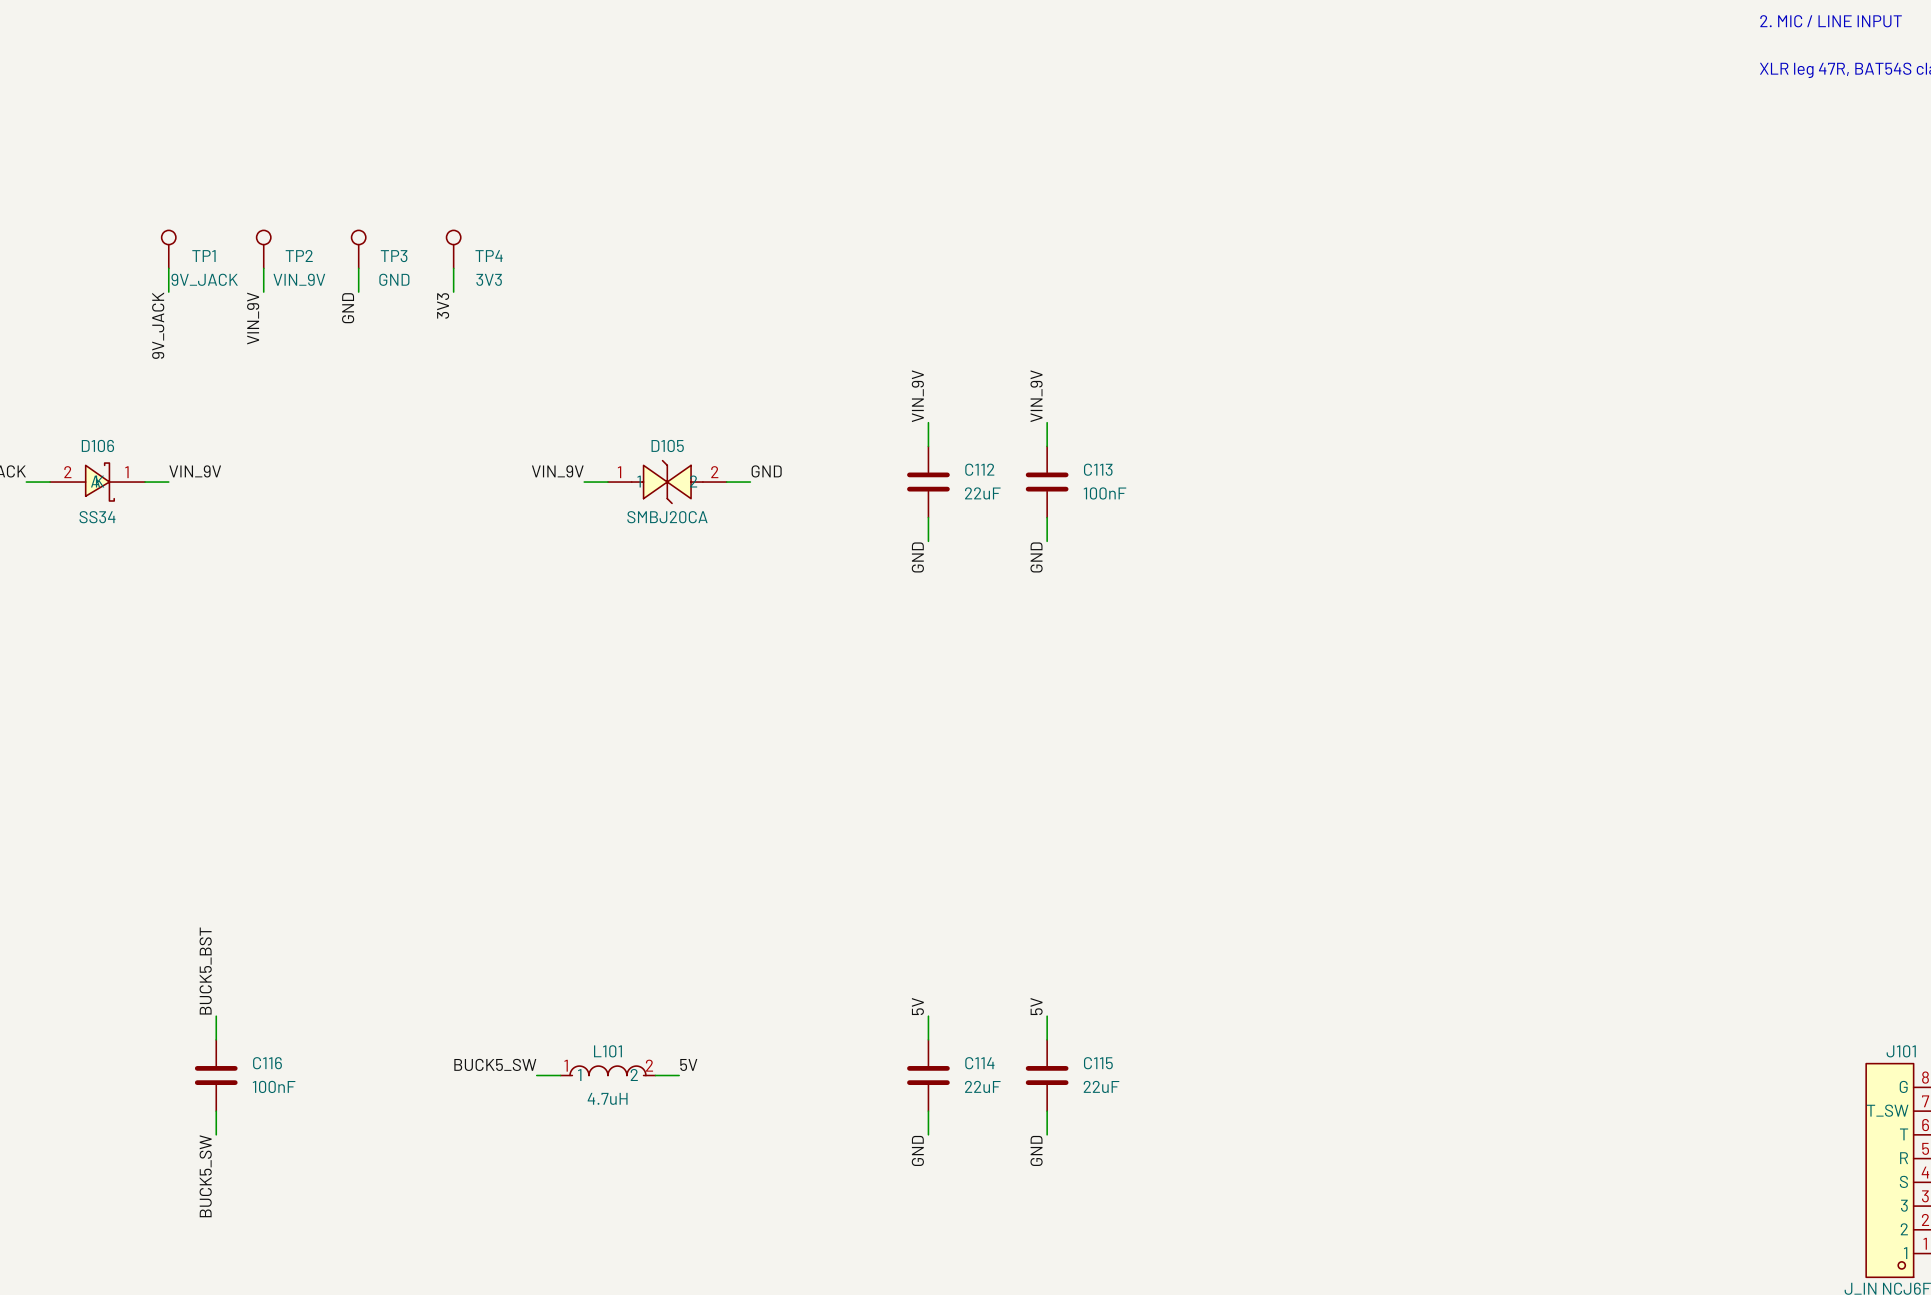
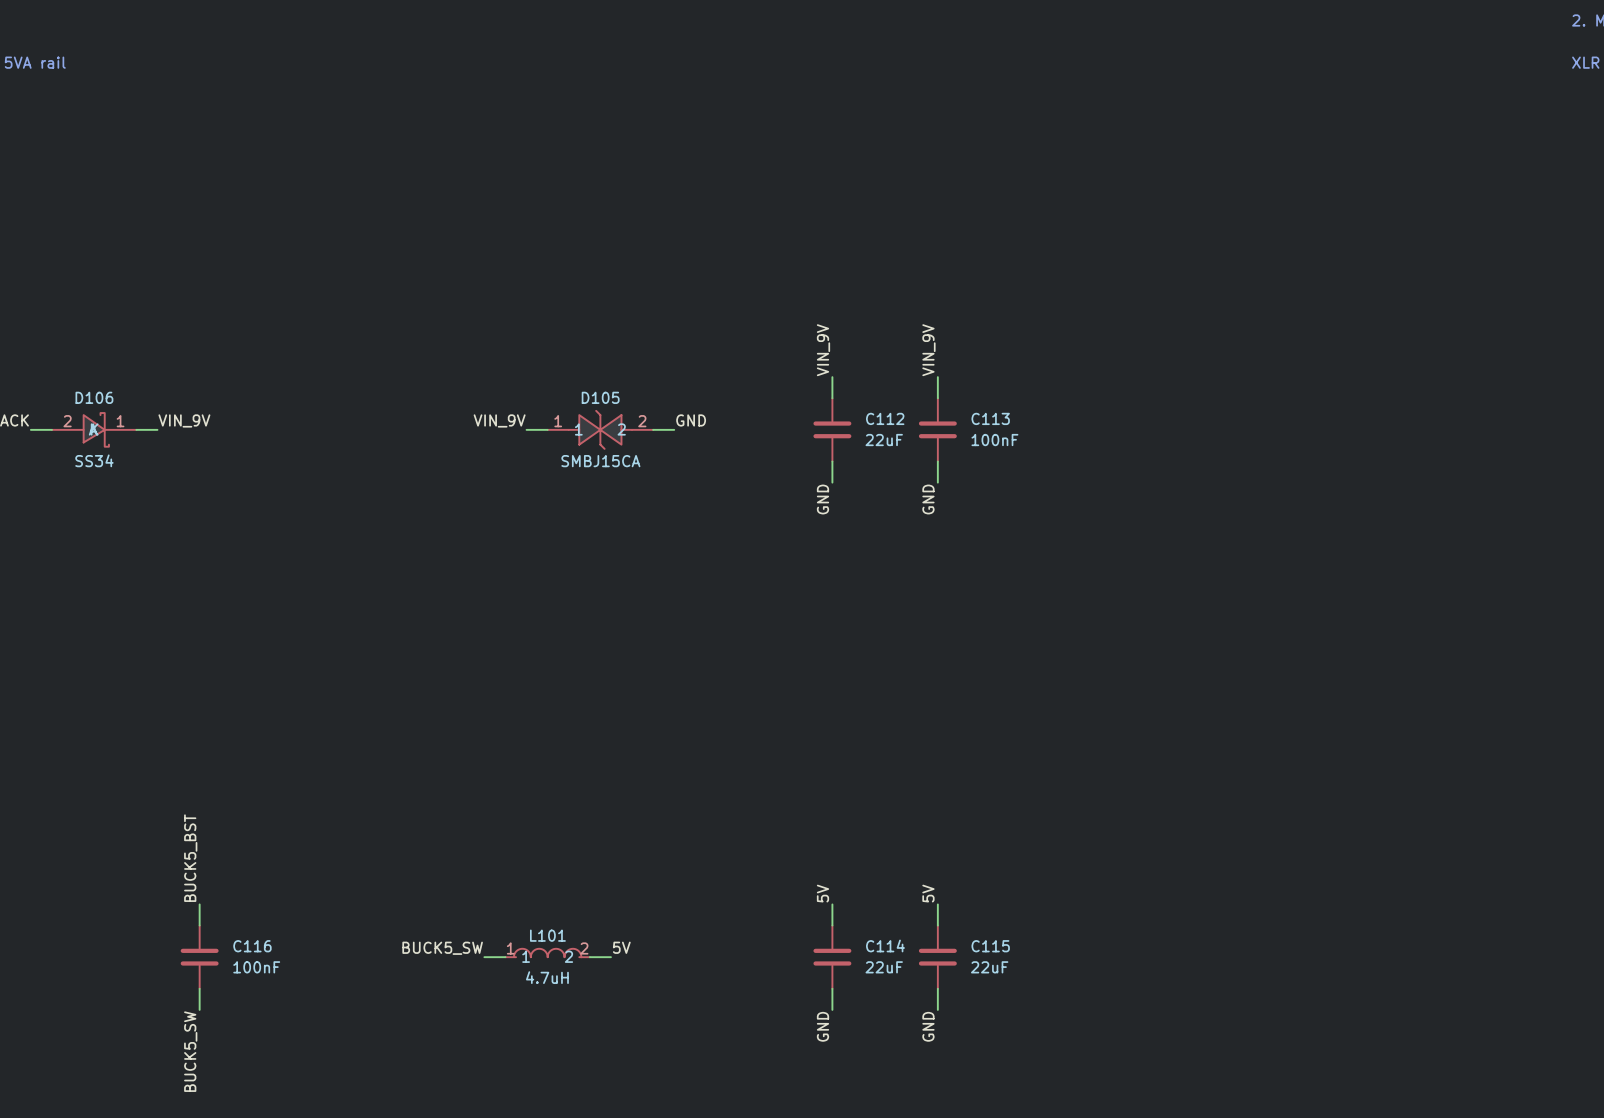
TP1: 9V_JACK (168, 249) -> none
TP2: VIN_9V (263, 249) -> none
TP3: GND (358, 249) -> none
TP4: 3V3 (453, 249) -> none
wire: (168, 268) (168, 292) -> none
wire: (263, 268) (263, 292) -> none
wire: (358, 268) (358, 292) -> none
wire: (453, 268) (453, 292) -> none
label: 3V3 (443, 305) -> none
label: GND (348, 308) -> none
label: VIN_9V (253, 318) -> none
label: 9V_JACK (158, 325) -> none
D105 value: SMBJ20CA (667, 517) -> SMBJ15CA (600, 461)

